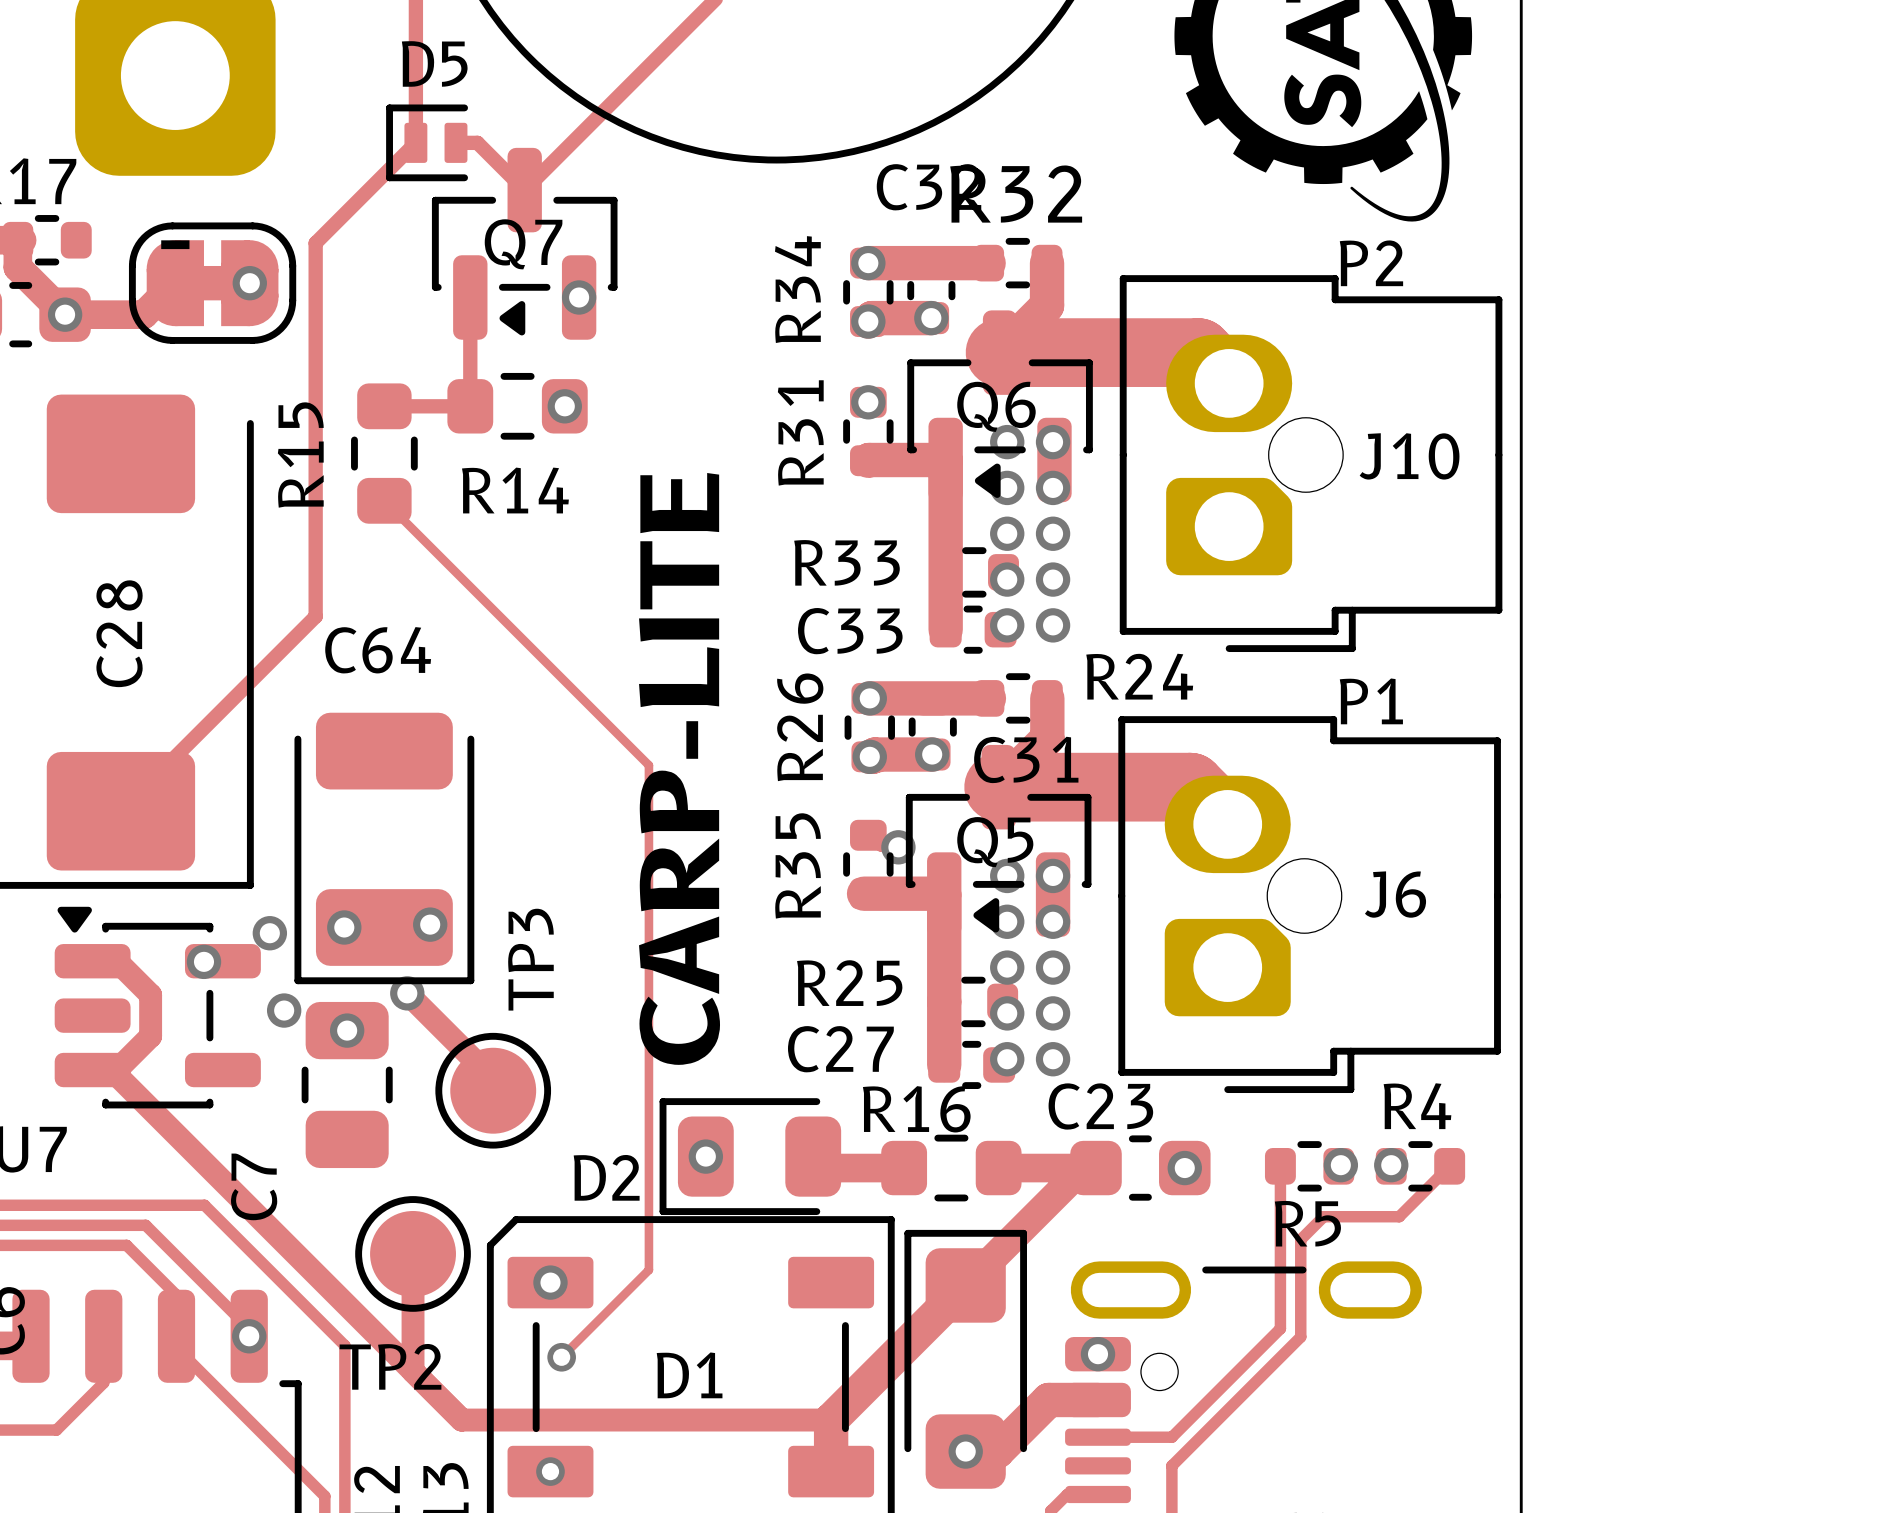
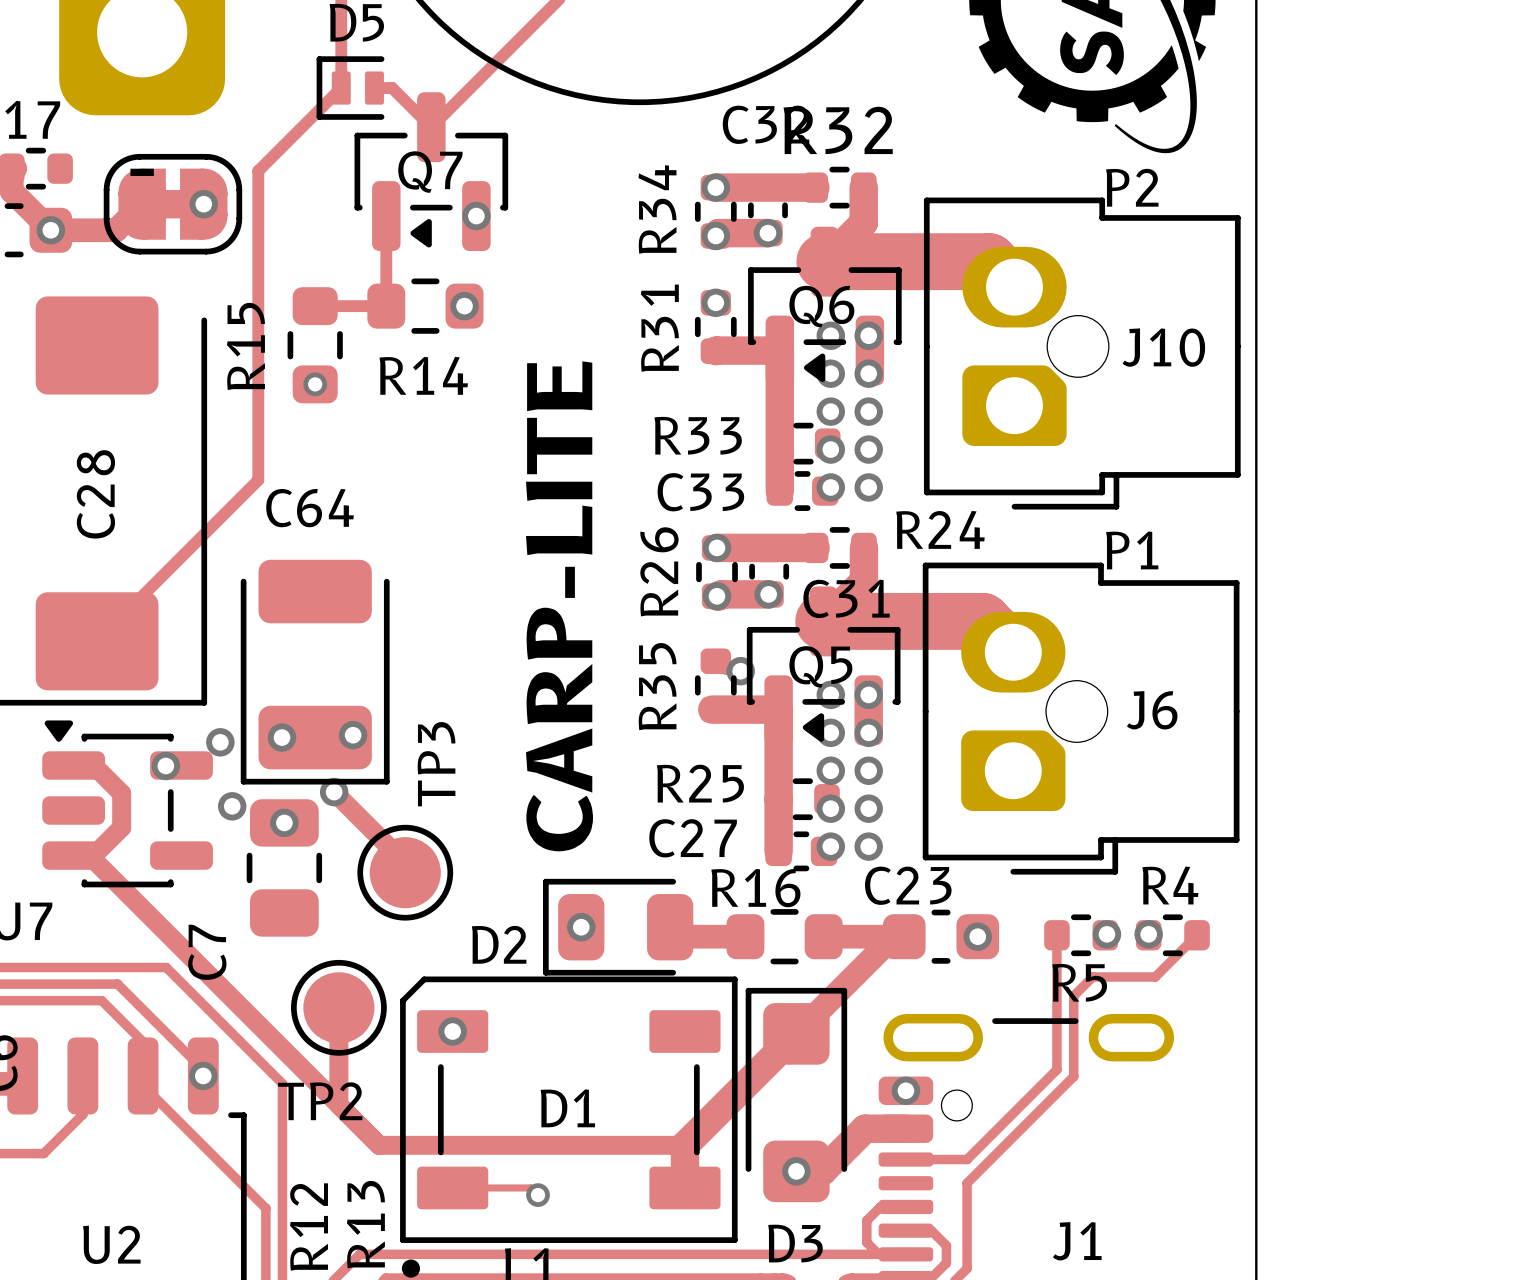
track: (384, 500) (648, 765) (648, 1269) (561, 1357) -> none
via: none -> (315, 384)
via: (561, 1357) -> none
track: none -> (452, 1187) (530, 1187) (538, 1195)
via: (550, 1471) -> none
via: none -> (538, 1195)

